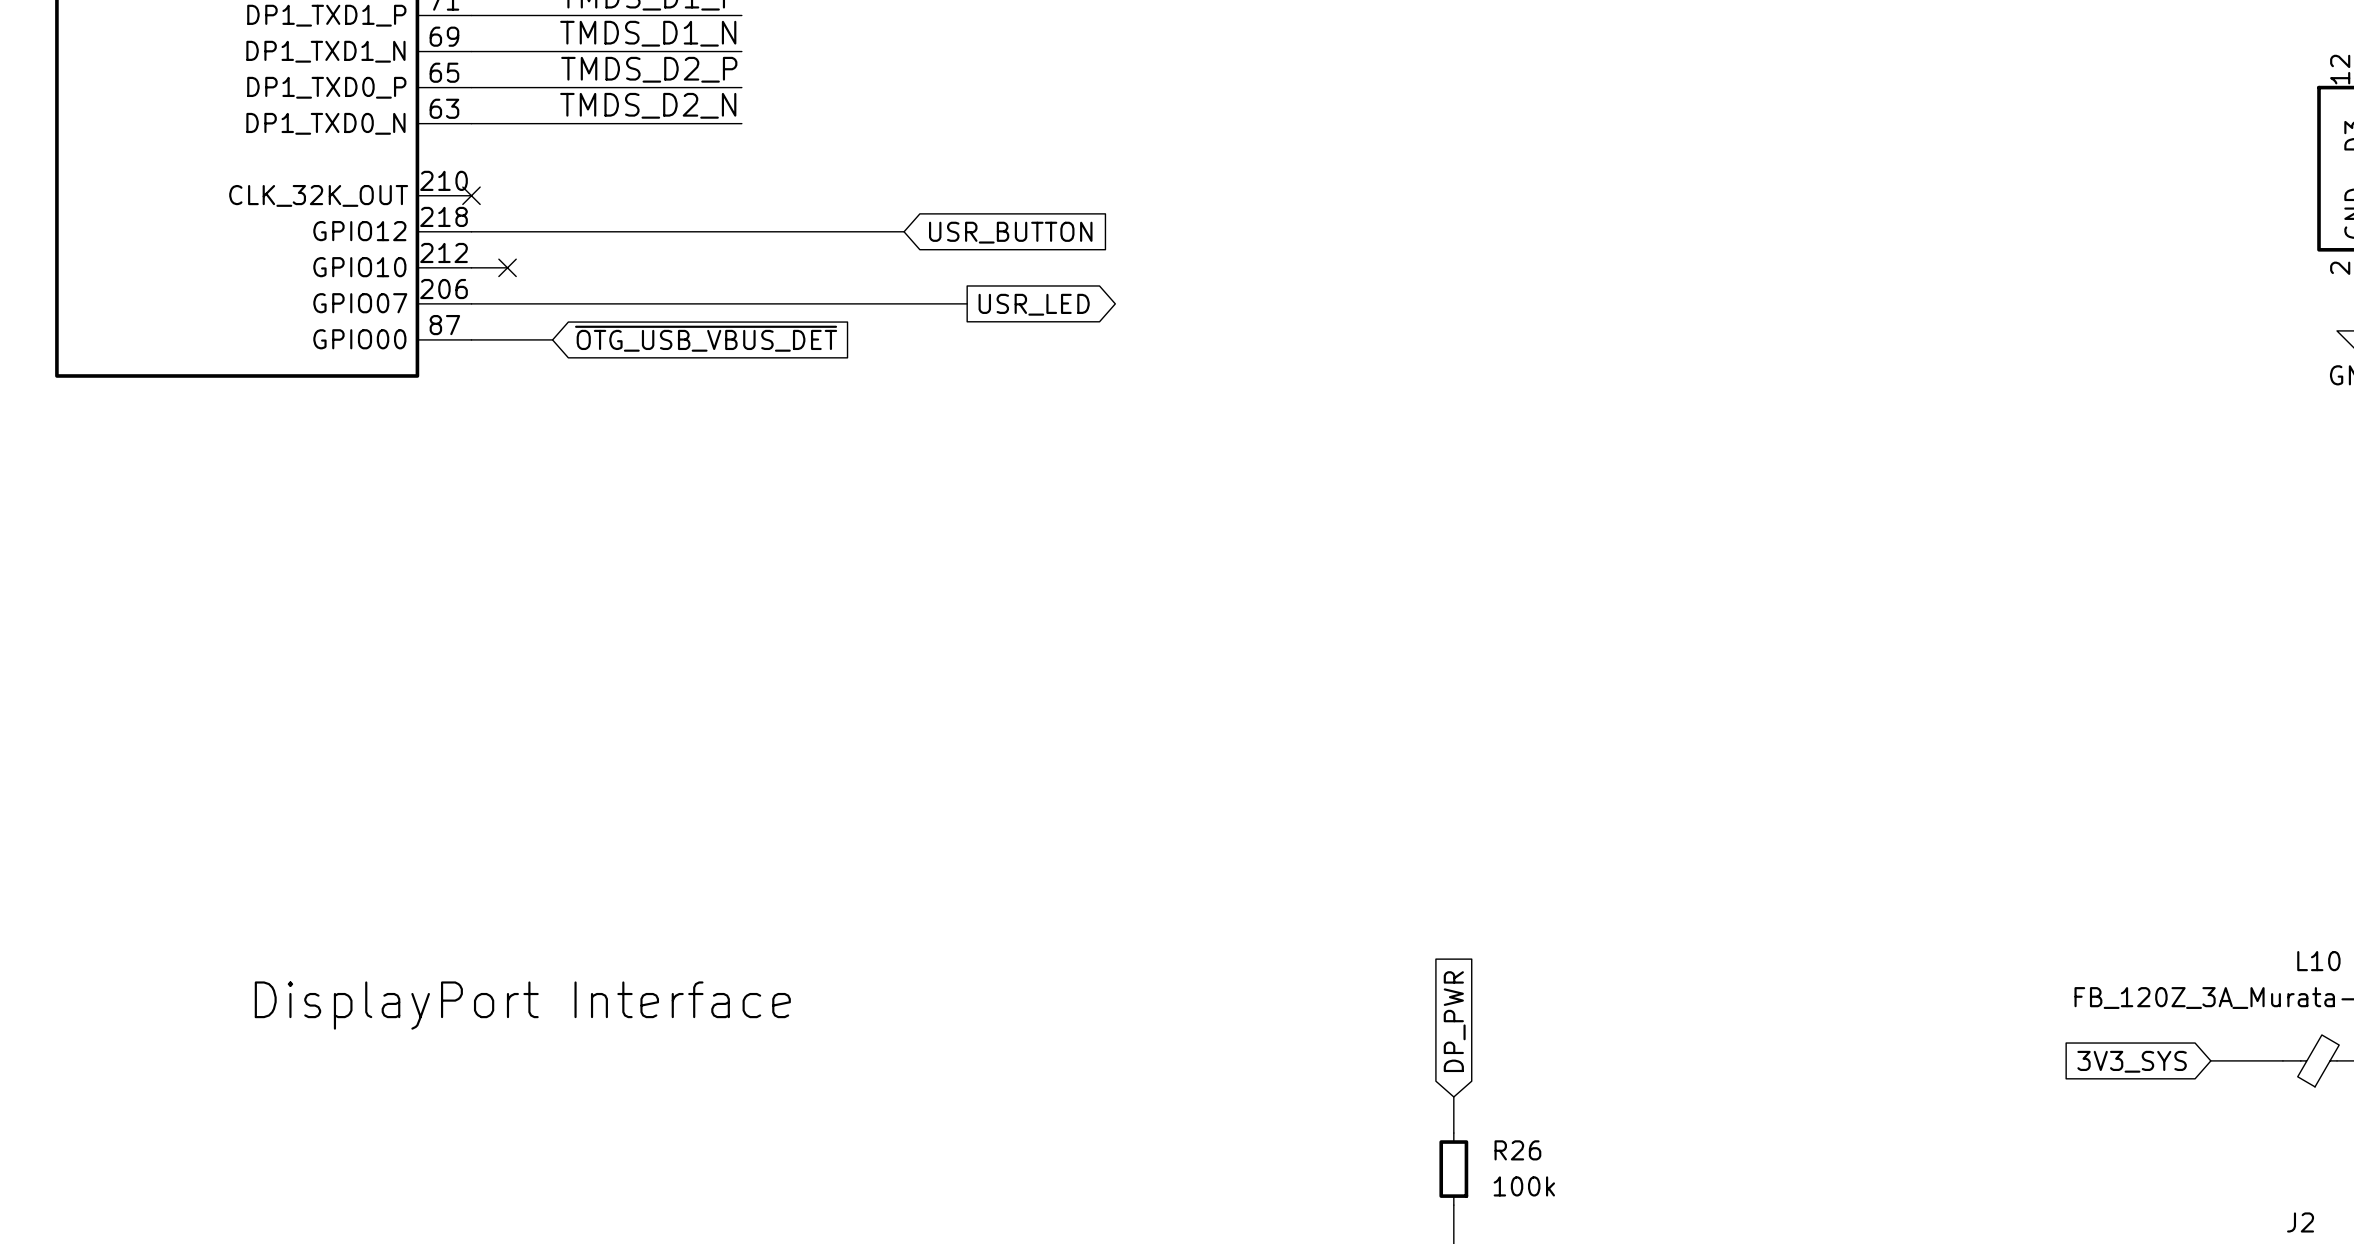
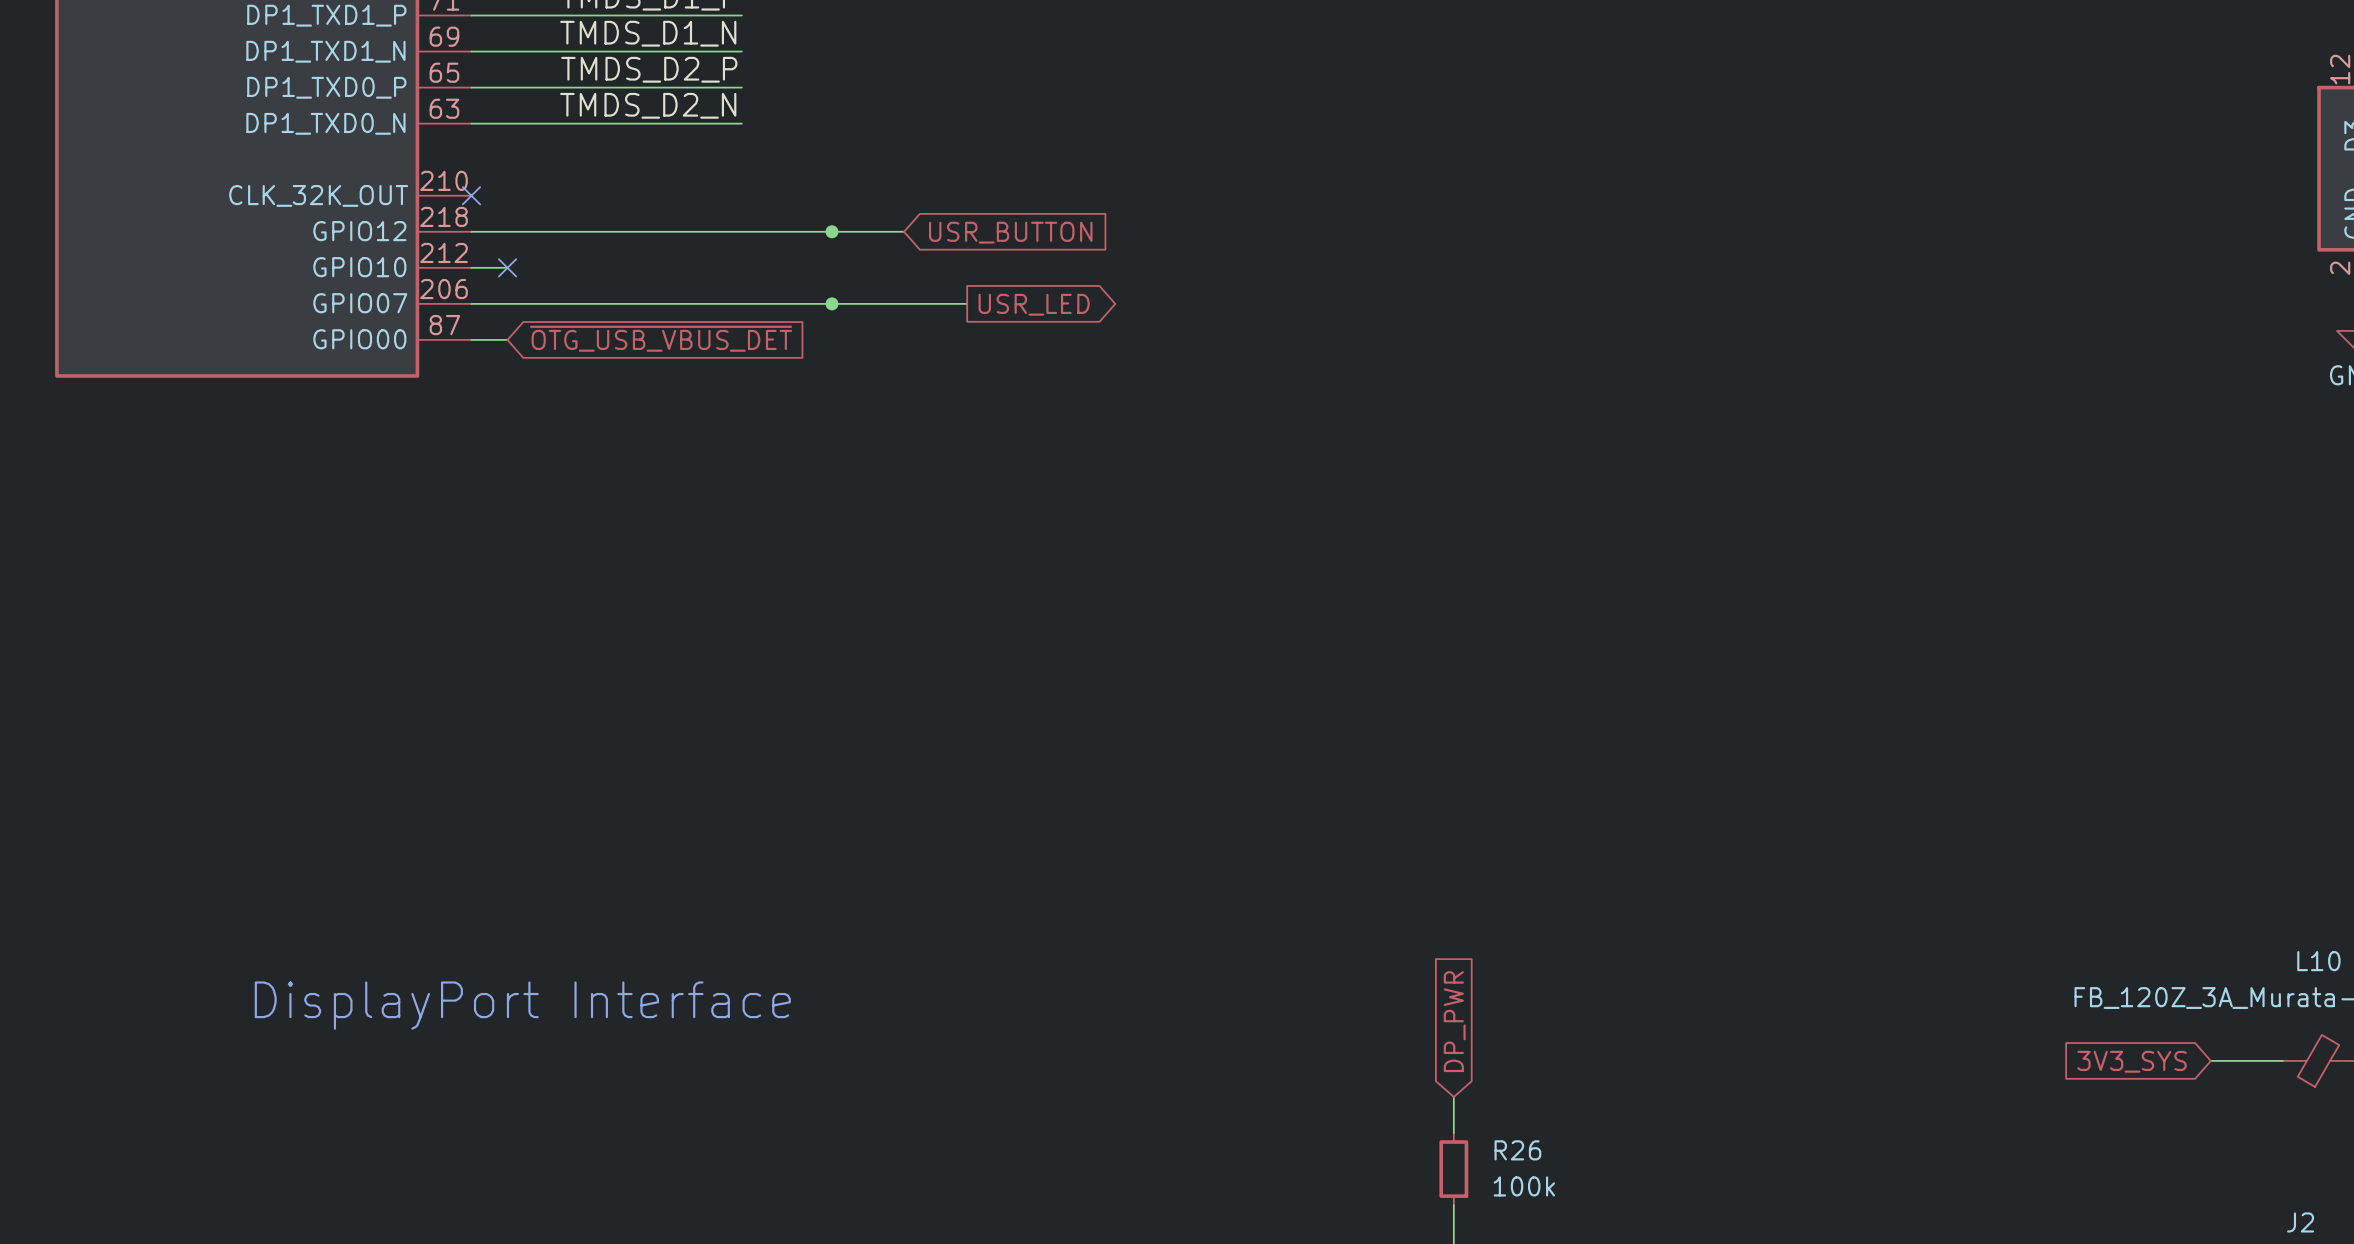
junction: none -> (831, 231)
junction: none -> (831, 303)
global label position: ~{OTG_USB_VBUS_DET} (706, 338) -> ~{OTG_USB_VBUS_DET} (661, 338)
wire: (507, 339) (552, 339) -> none

